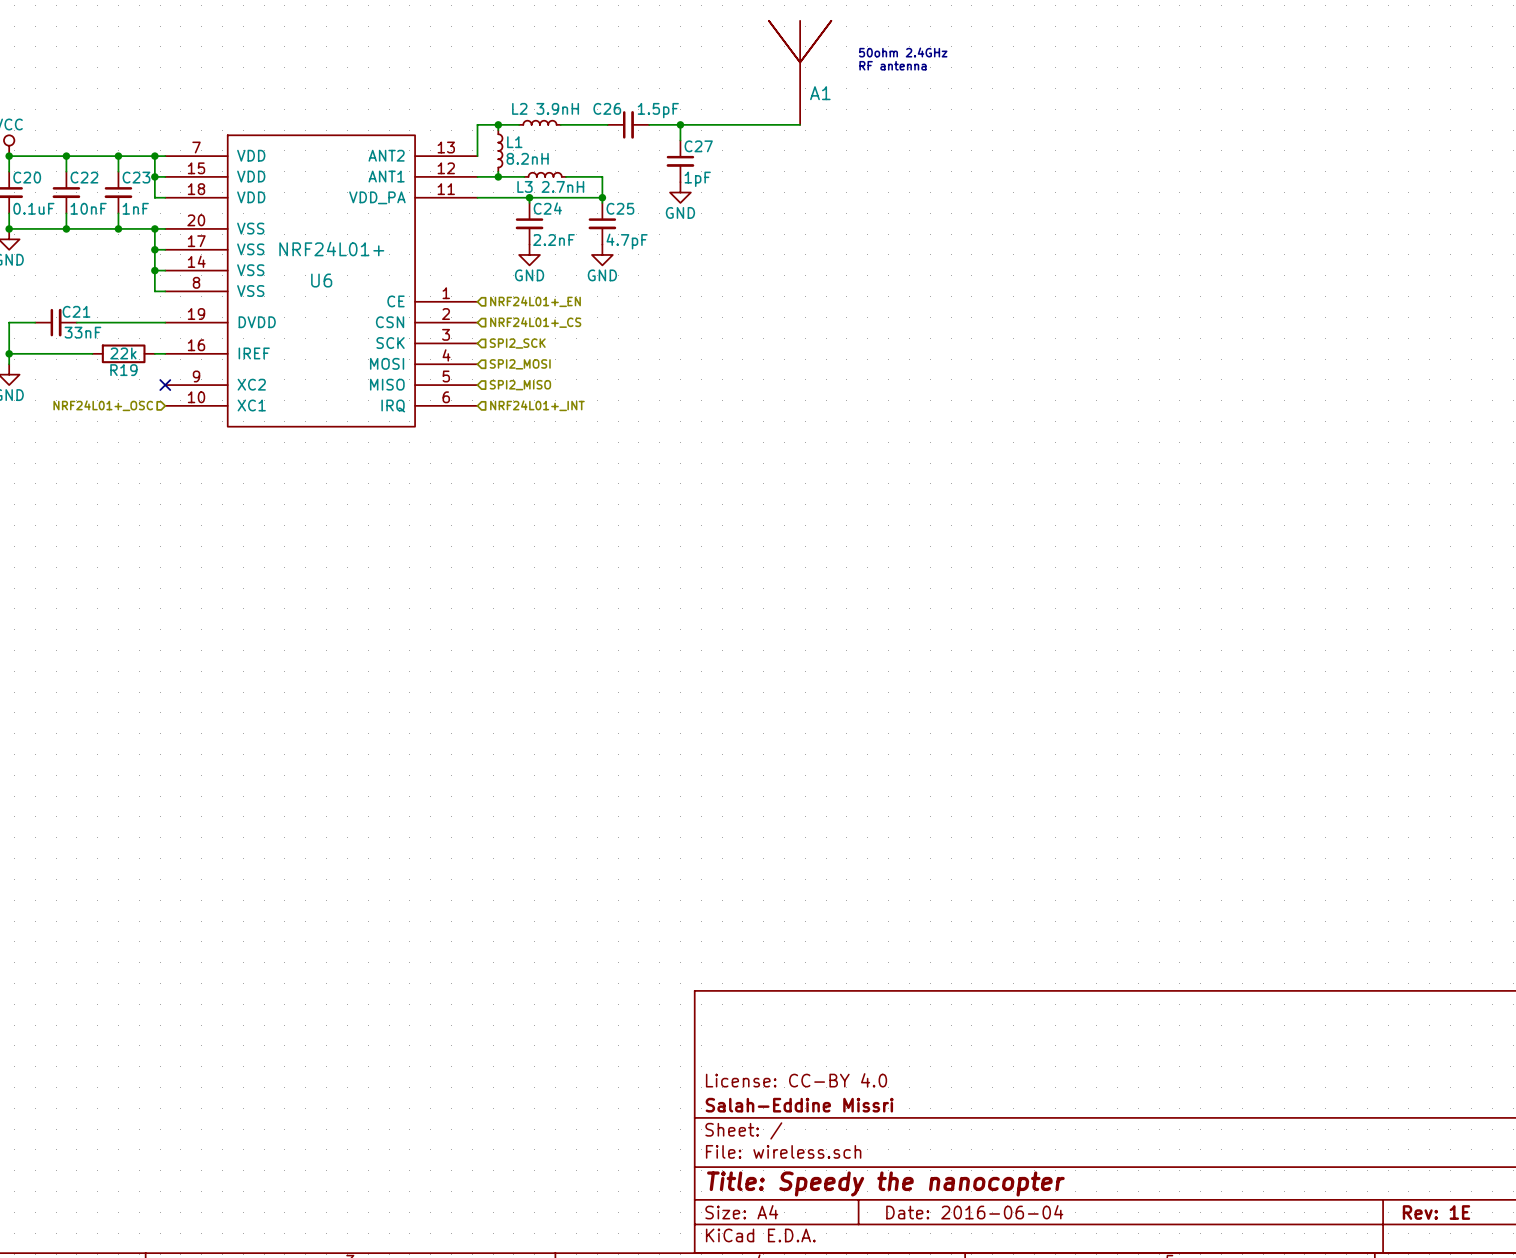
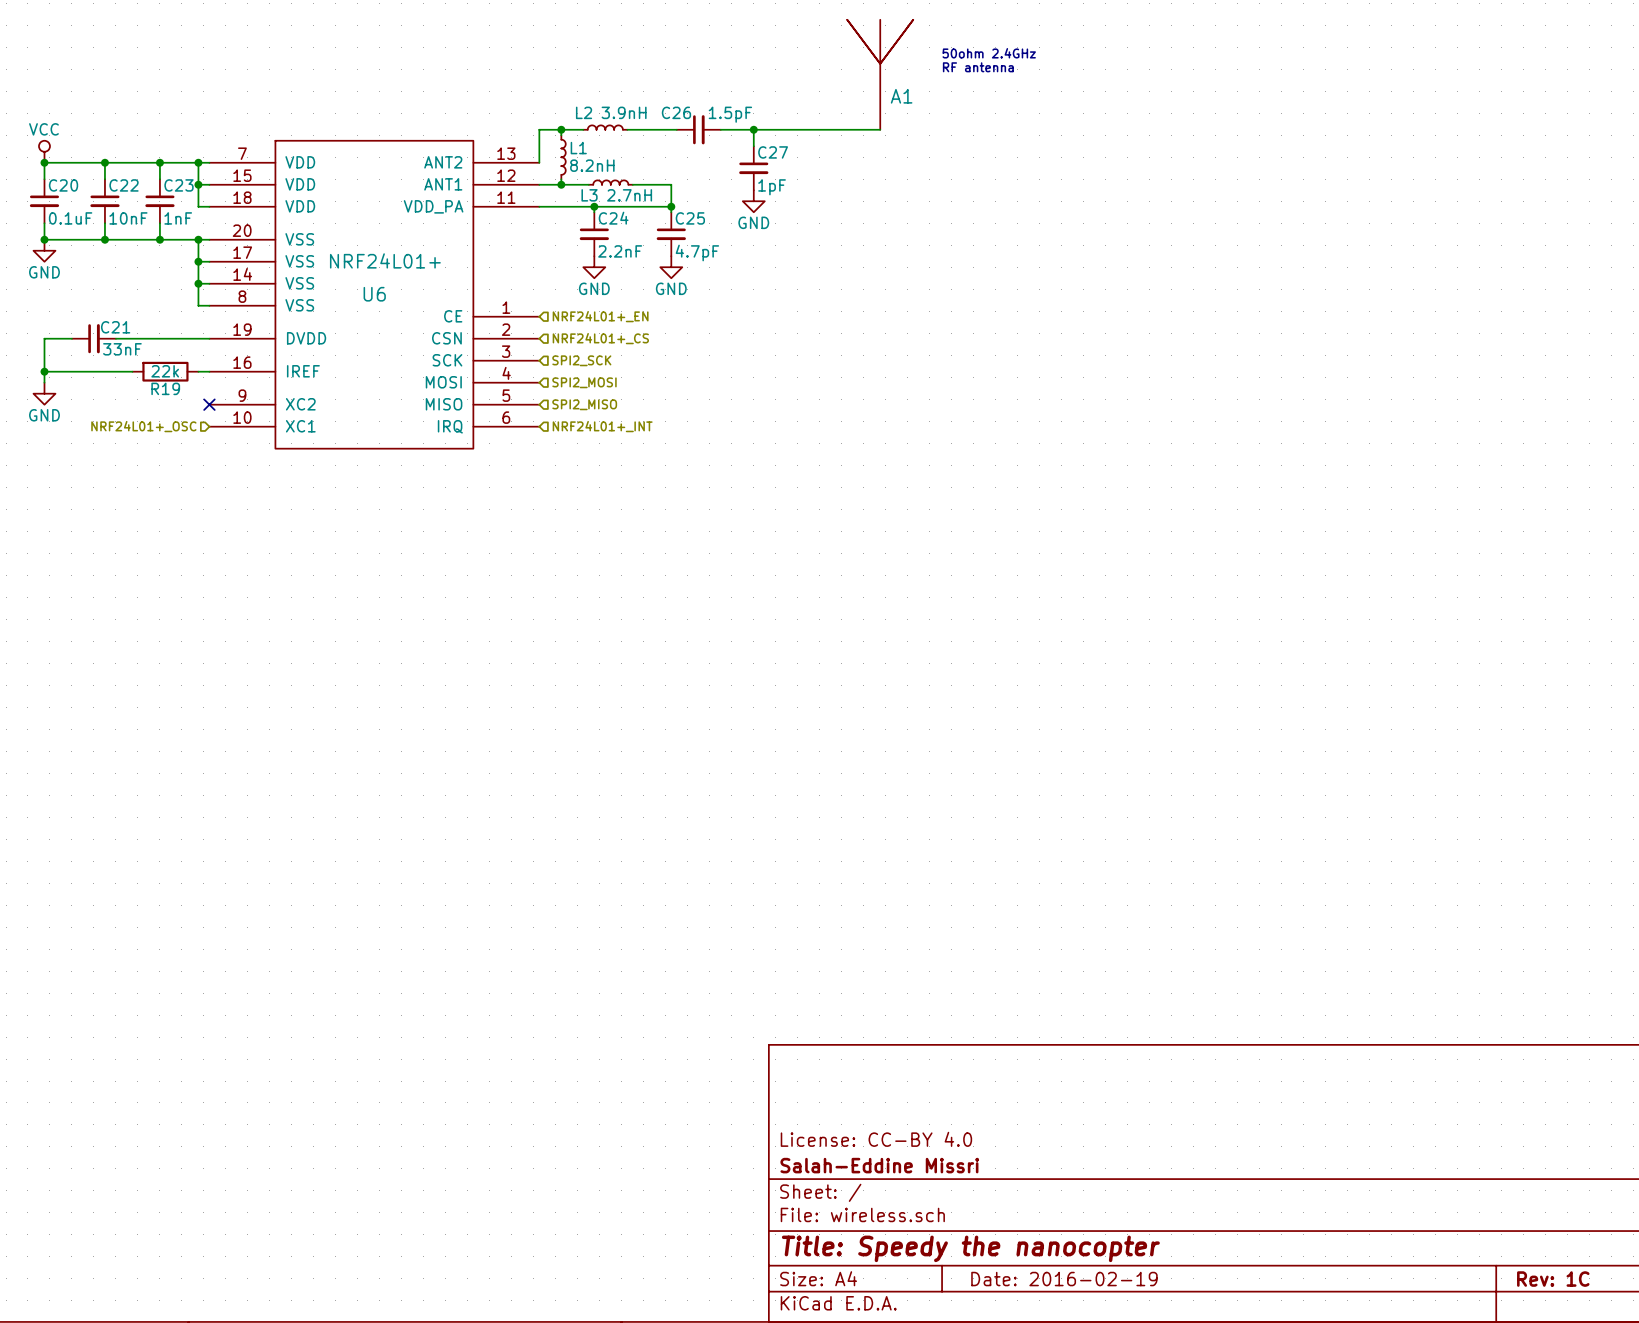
title block: Date: 2016-06-04 (974, 1212) -> Date: 2016-02-19 (1064, 1279)
title block: Rev: 1E (1436, 1212) -> Rev: 1C (1553, 1279)

